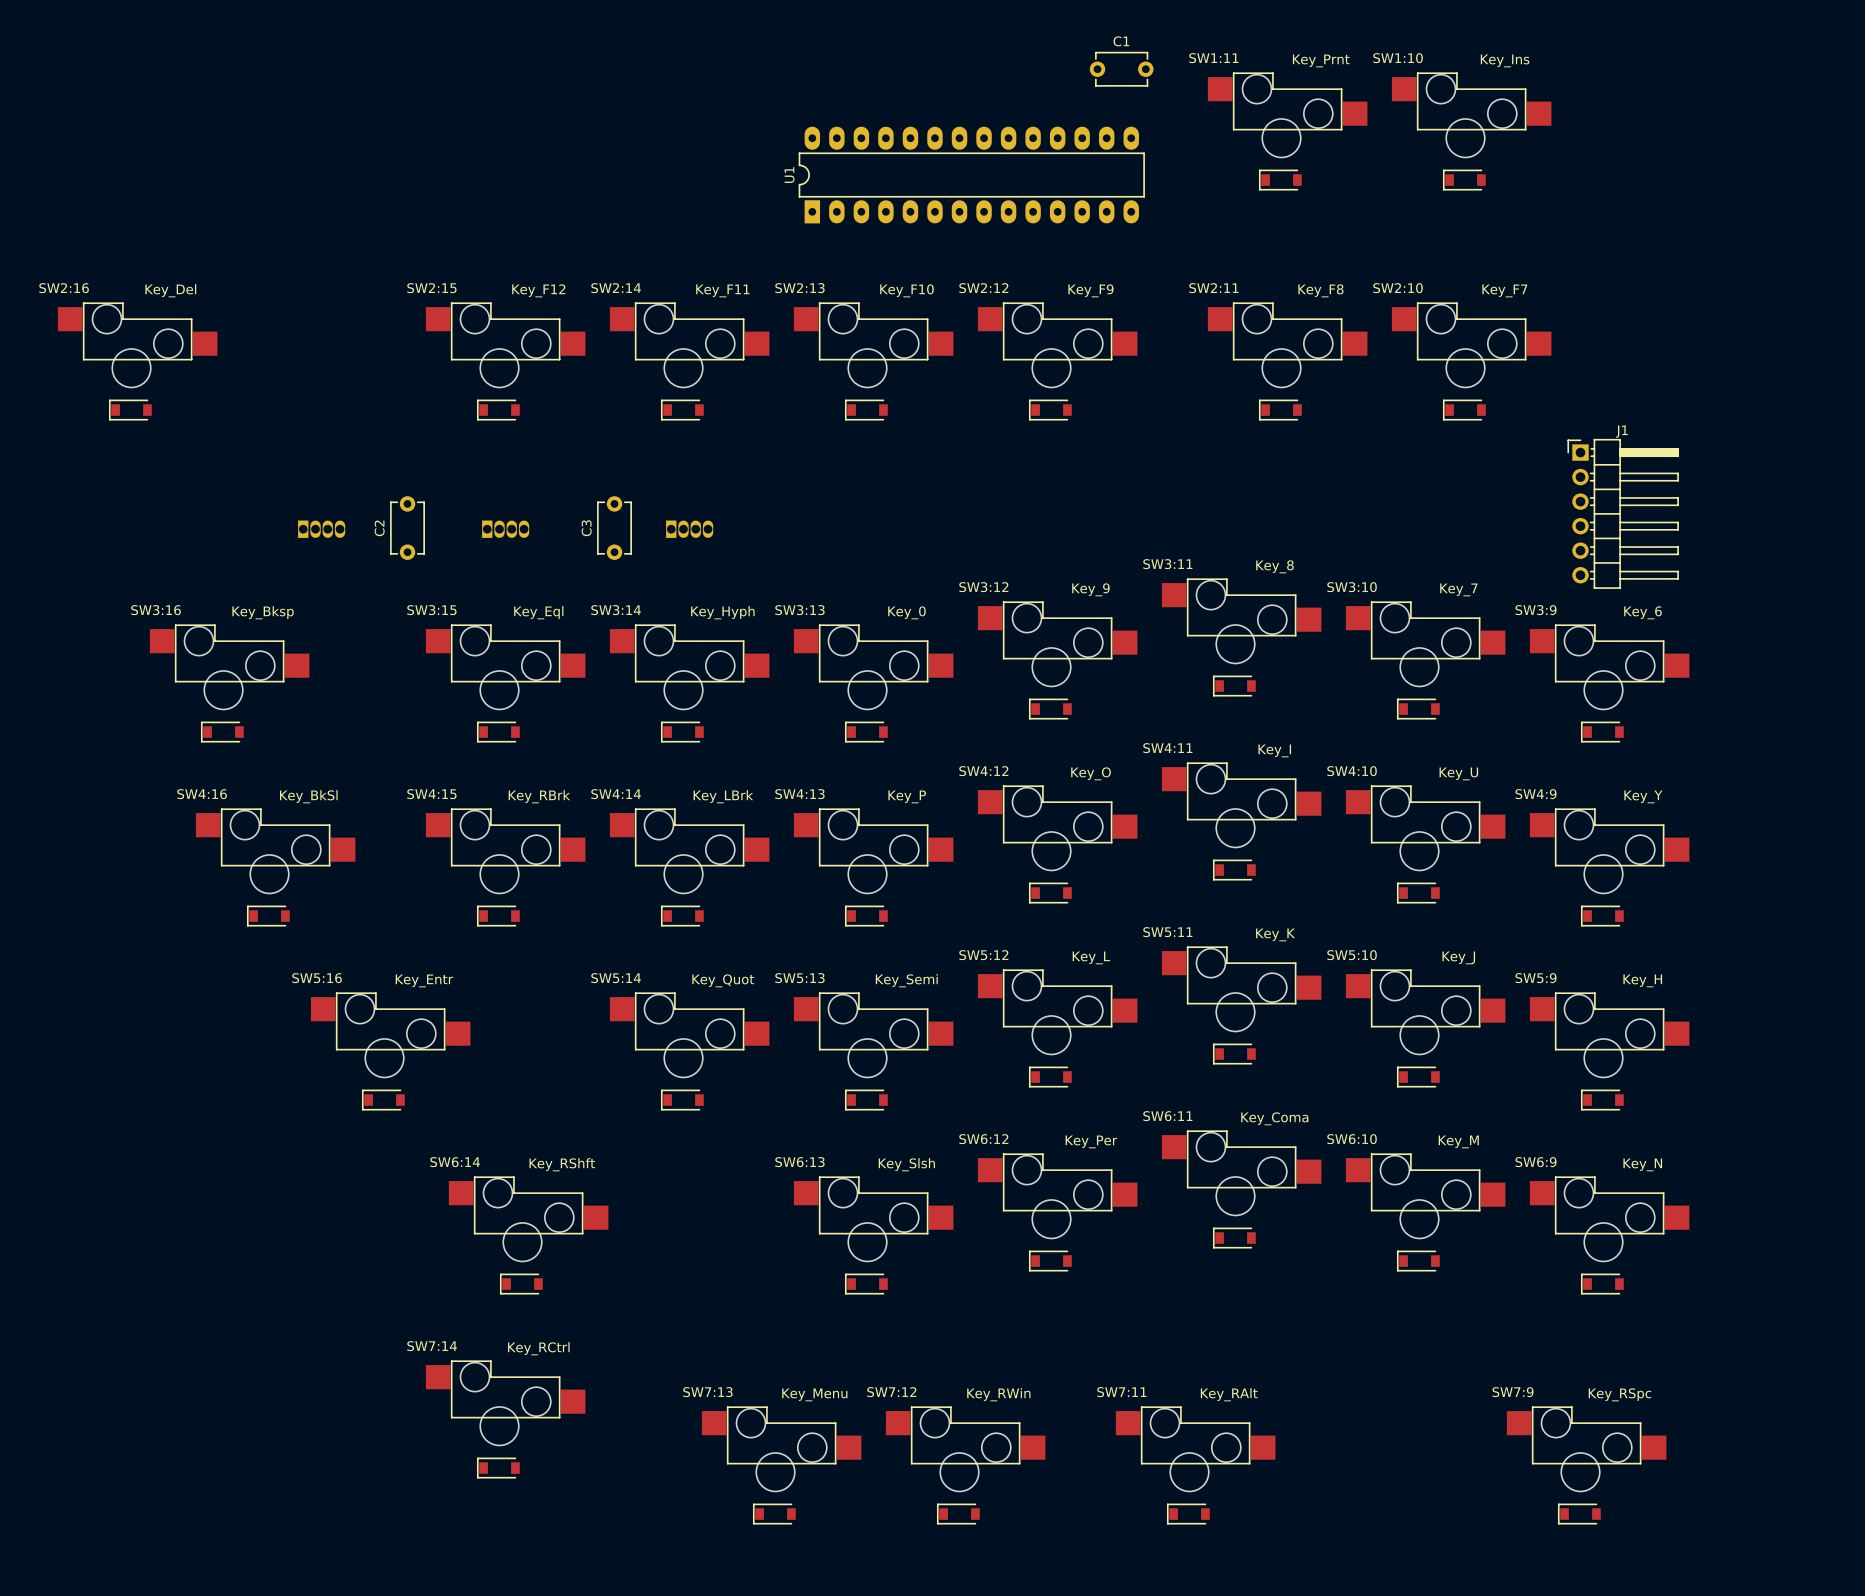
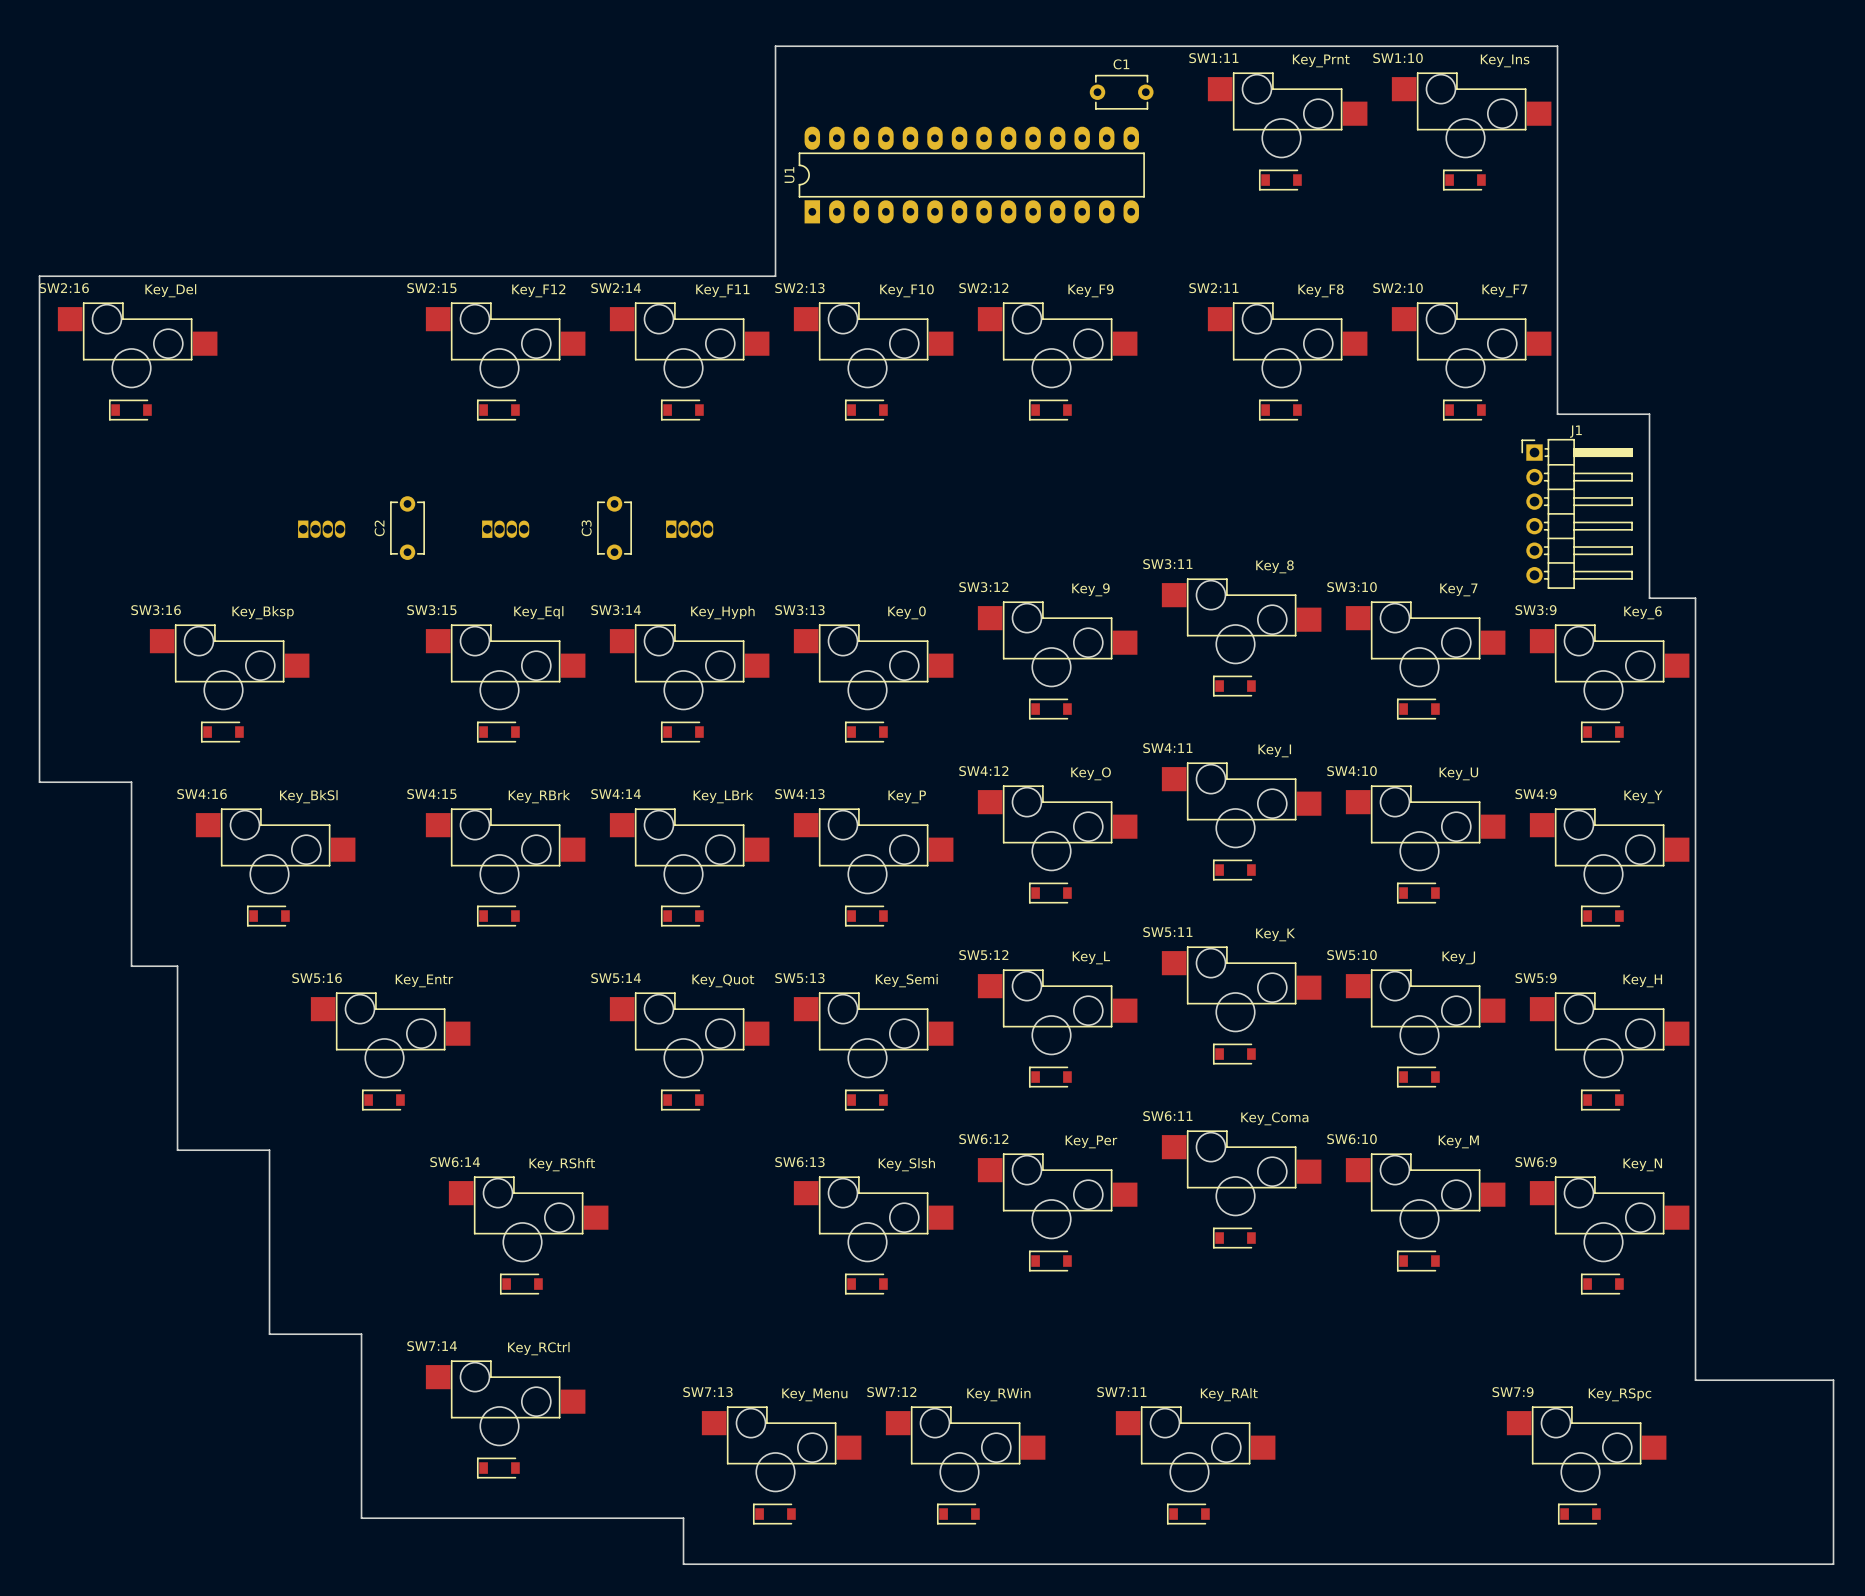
board edge: none -> (775, 46) (1557, 46) (1557, 414) (1649, 414) (1649, 598) (1695, 598) (1695, 1380) (1833, 1380) (1833, 1564) (683, 1564) (683, 1518) (361, 1518) (361, 1334) (269, 1334) (269, 1150) (177, 1150) (177, 966) (131, 966) (131, 782) (39, 782) (39, 276) (775, 276) (775, 46)
C1 position: (1121, 69) -> (1121, 92)
J1 position: (1623, 513) -> (1577, 513)

